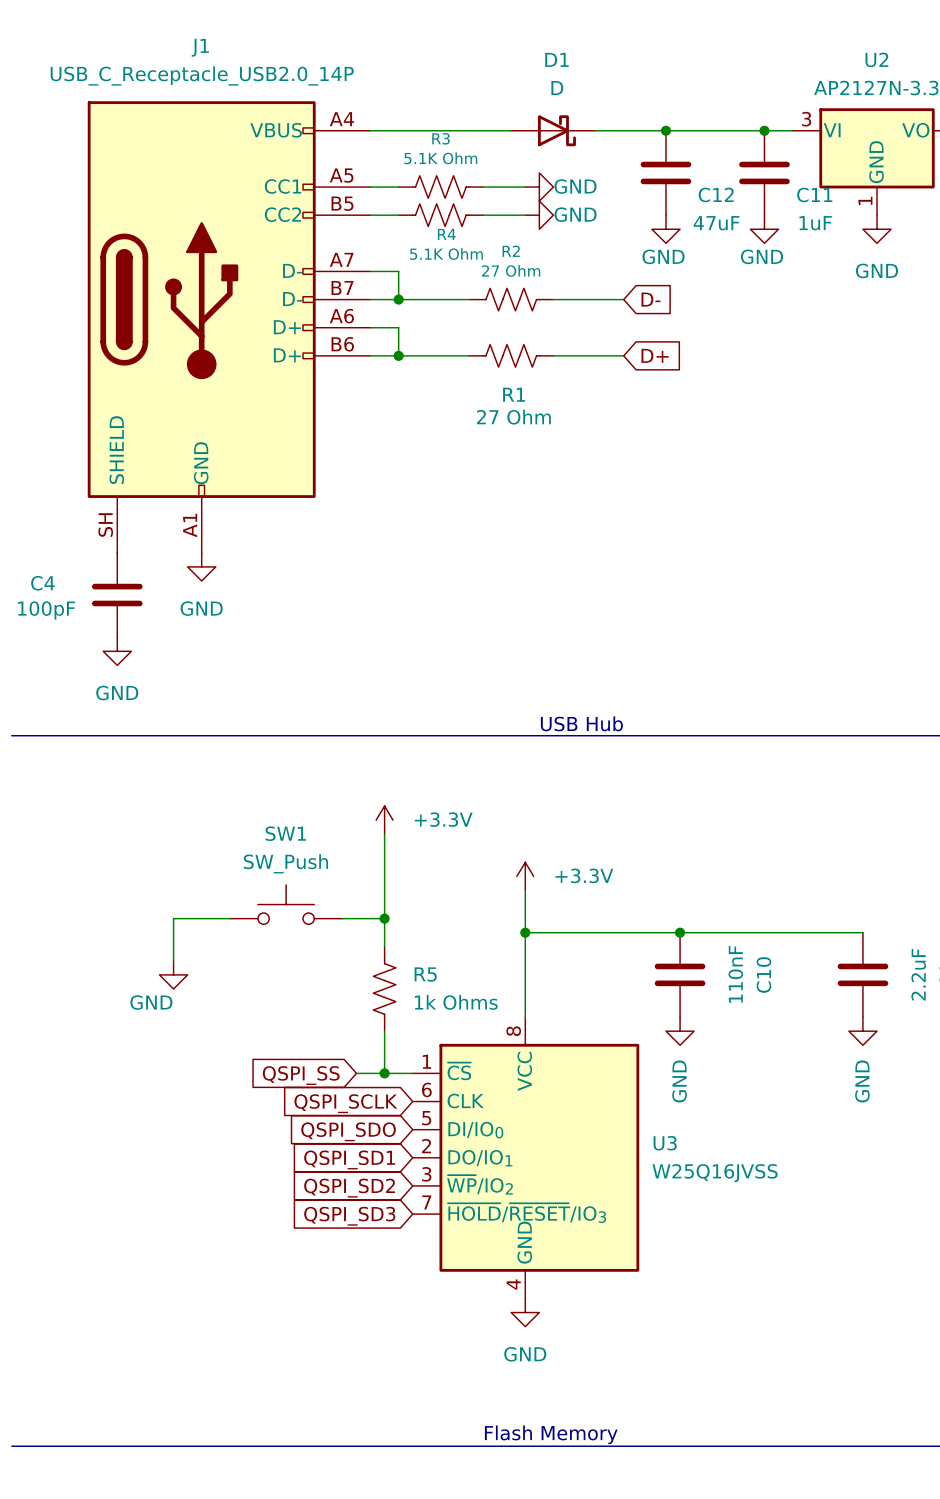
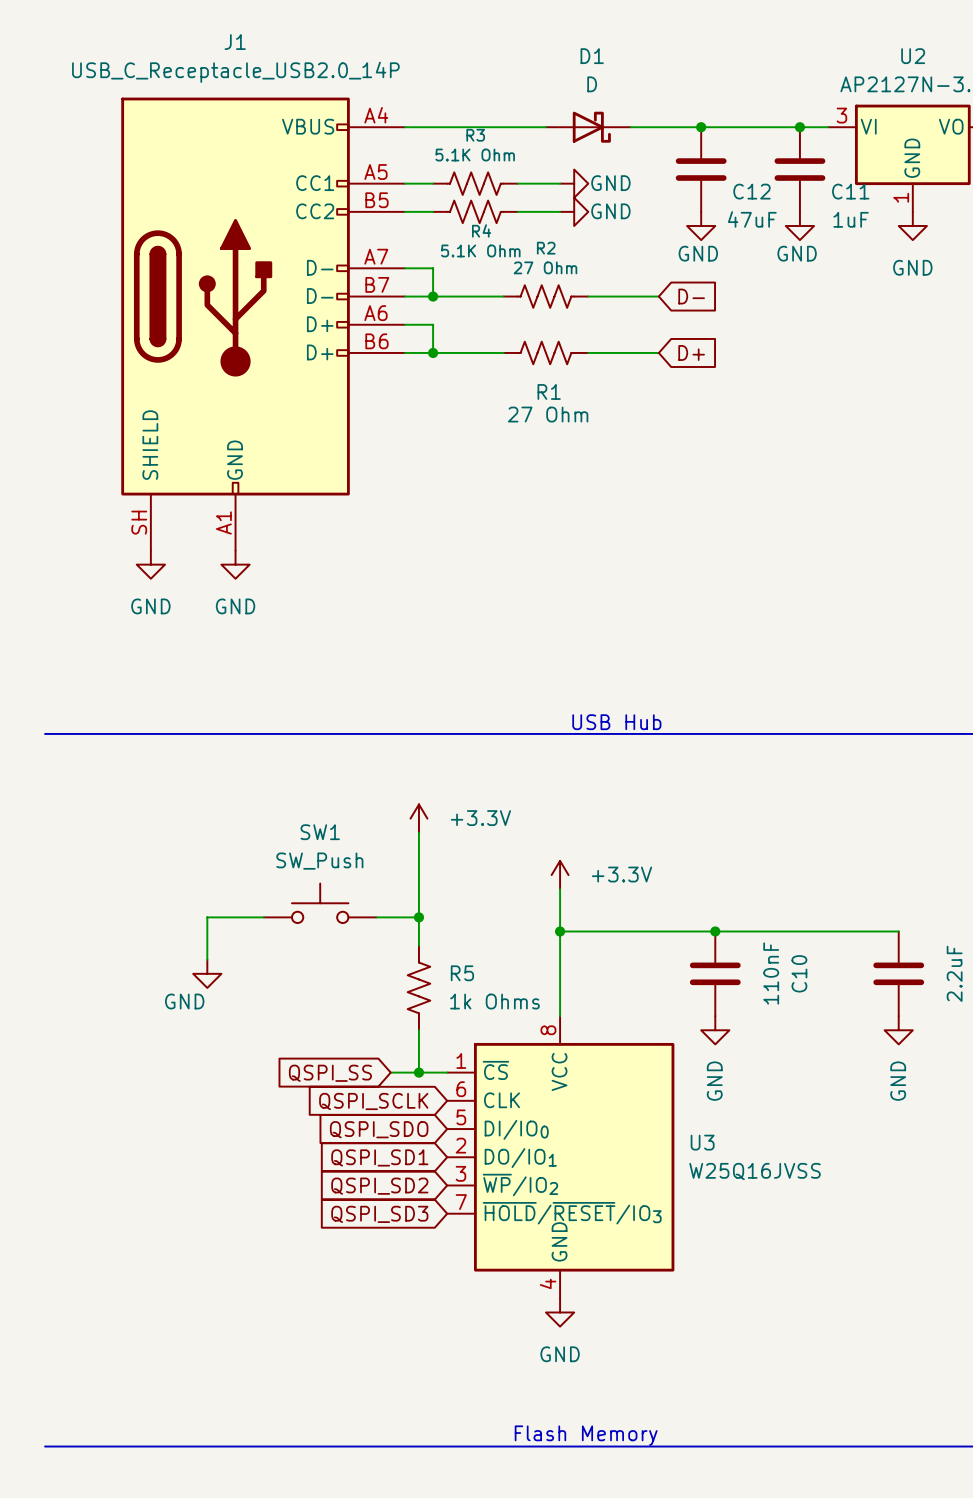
C4: 100pF (117, 595) -> none
power symbol position: GND (117, 651) -> GND (150, 564)

